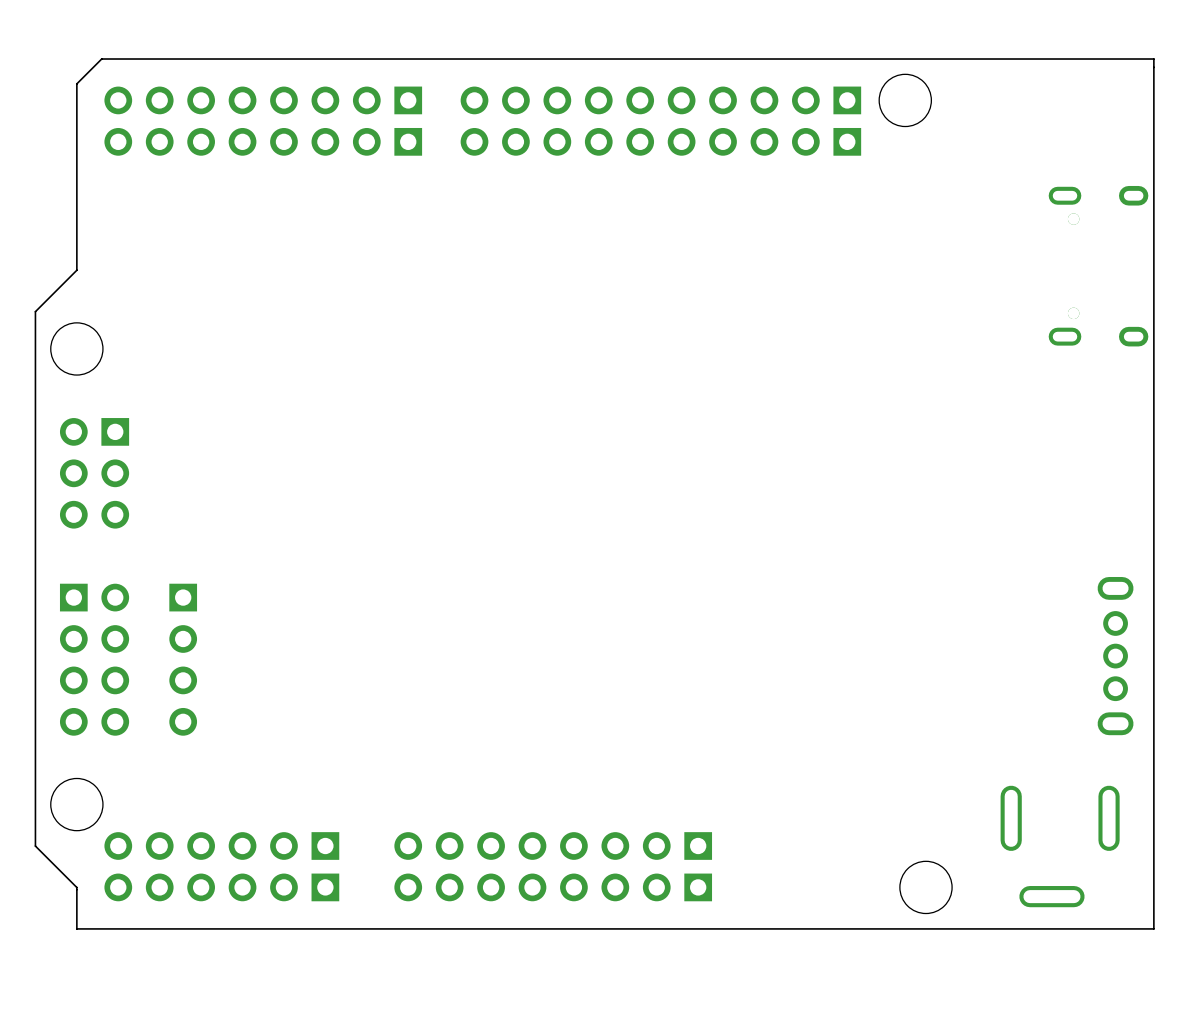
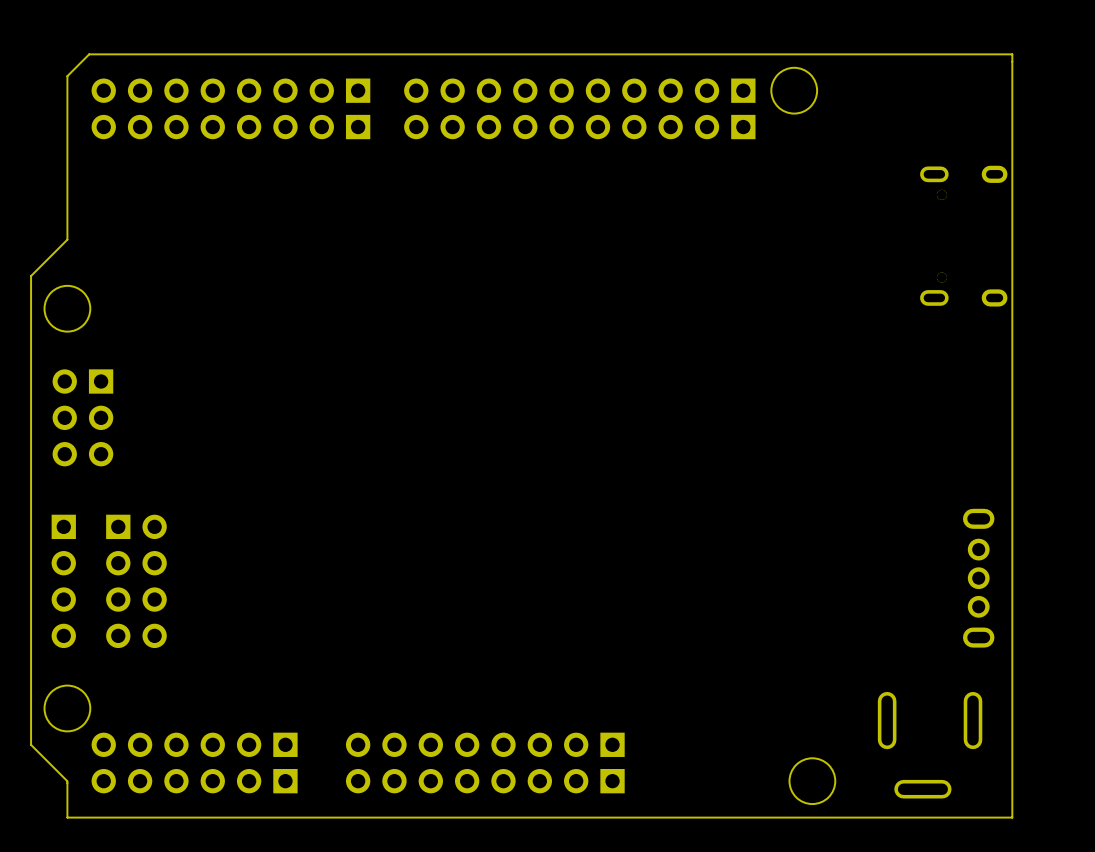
part position: (94, 659) -> (136, 581)
part position: (183, 659) -> (63, 581)

